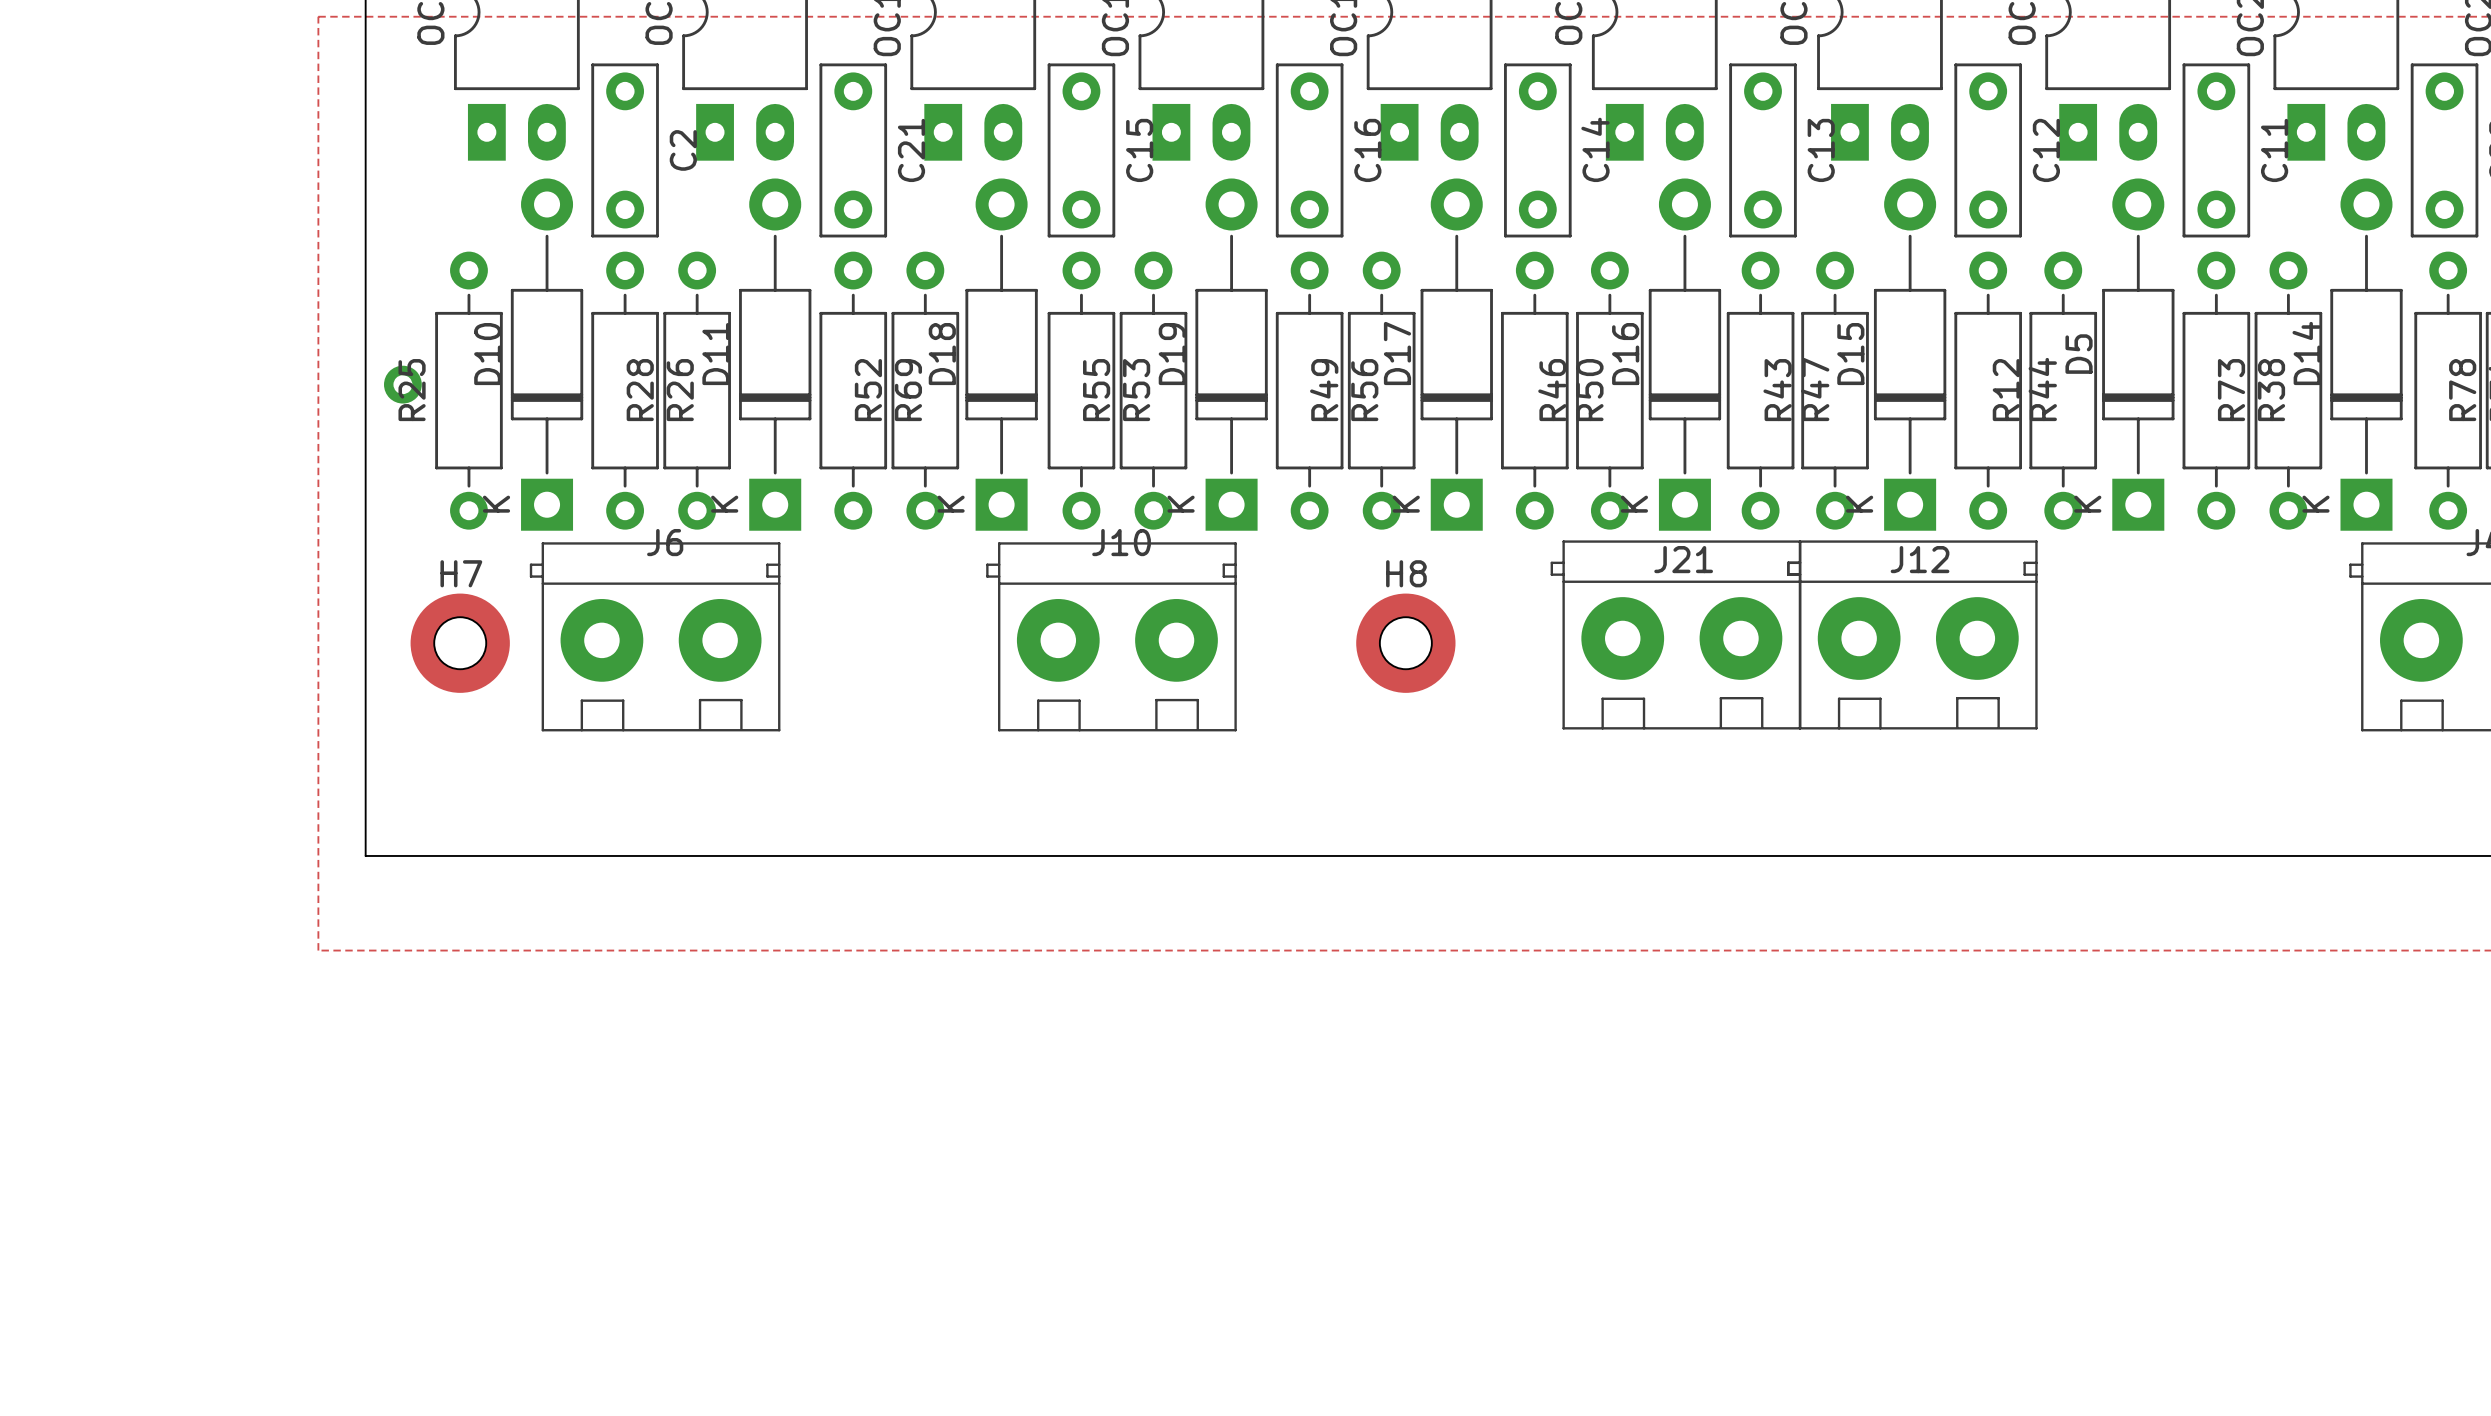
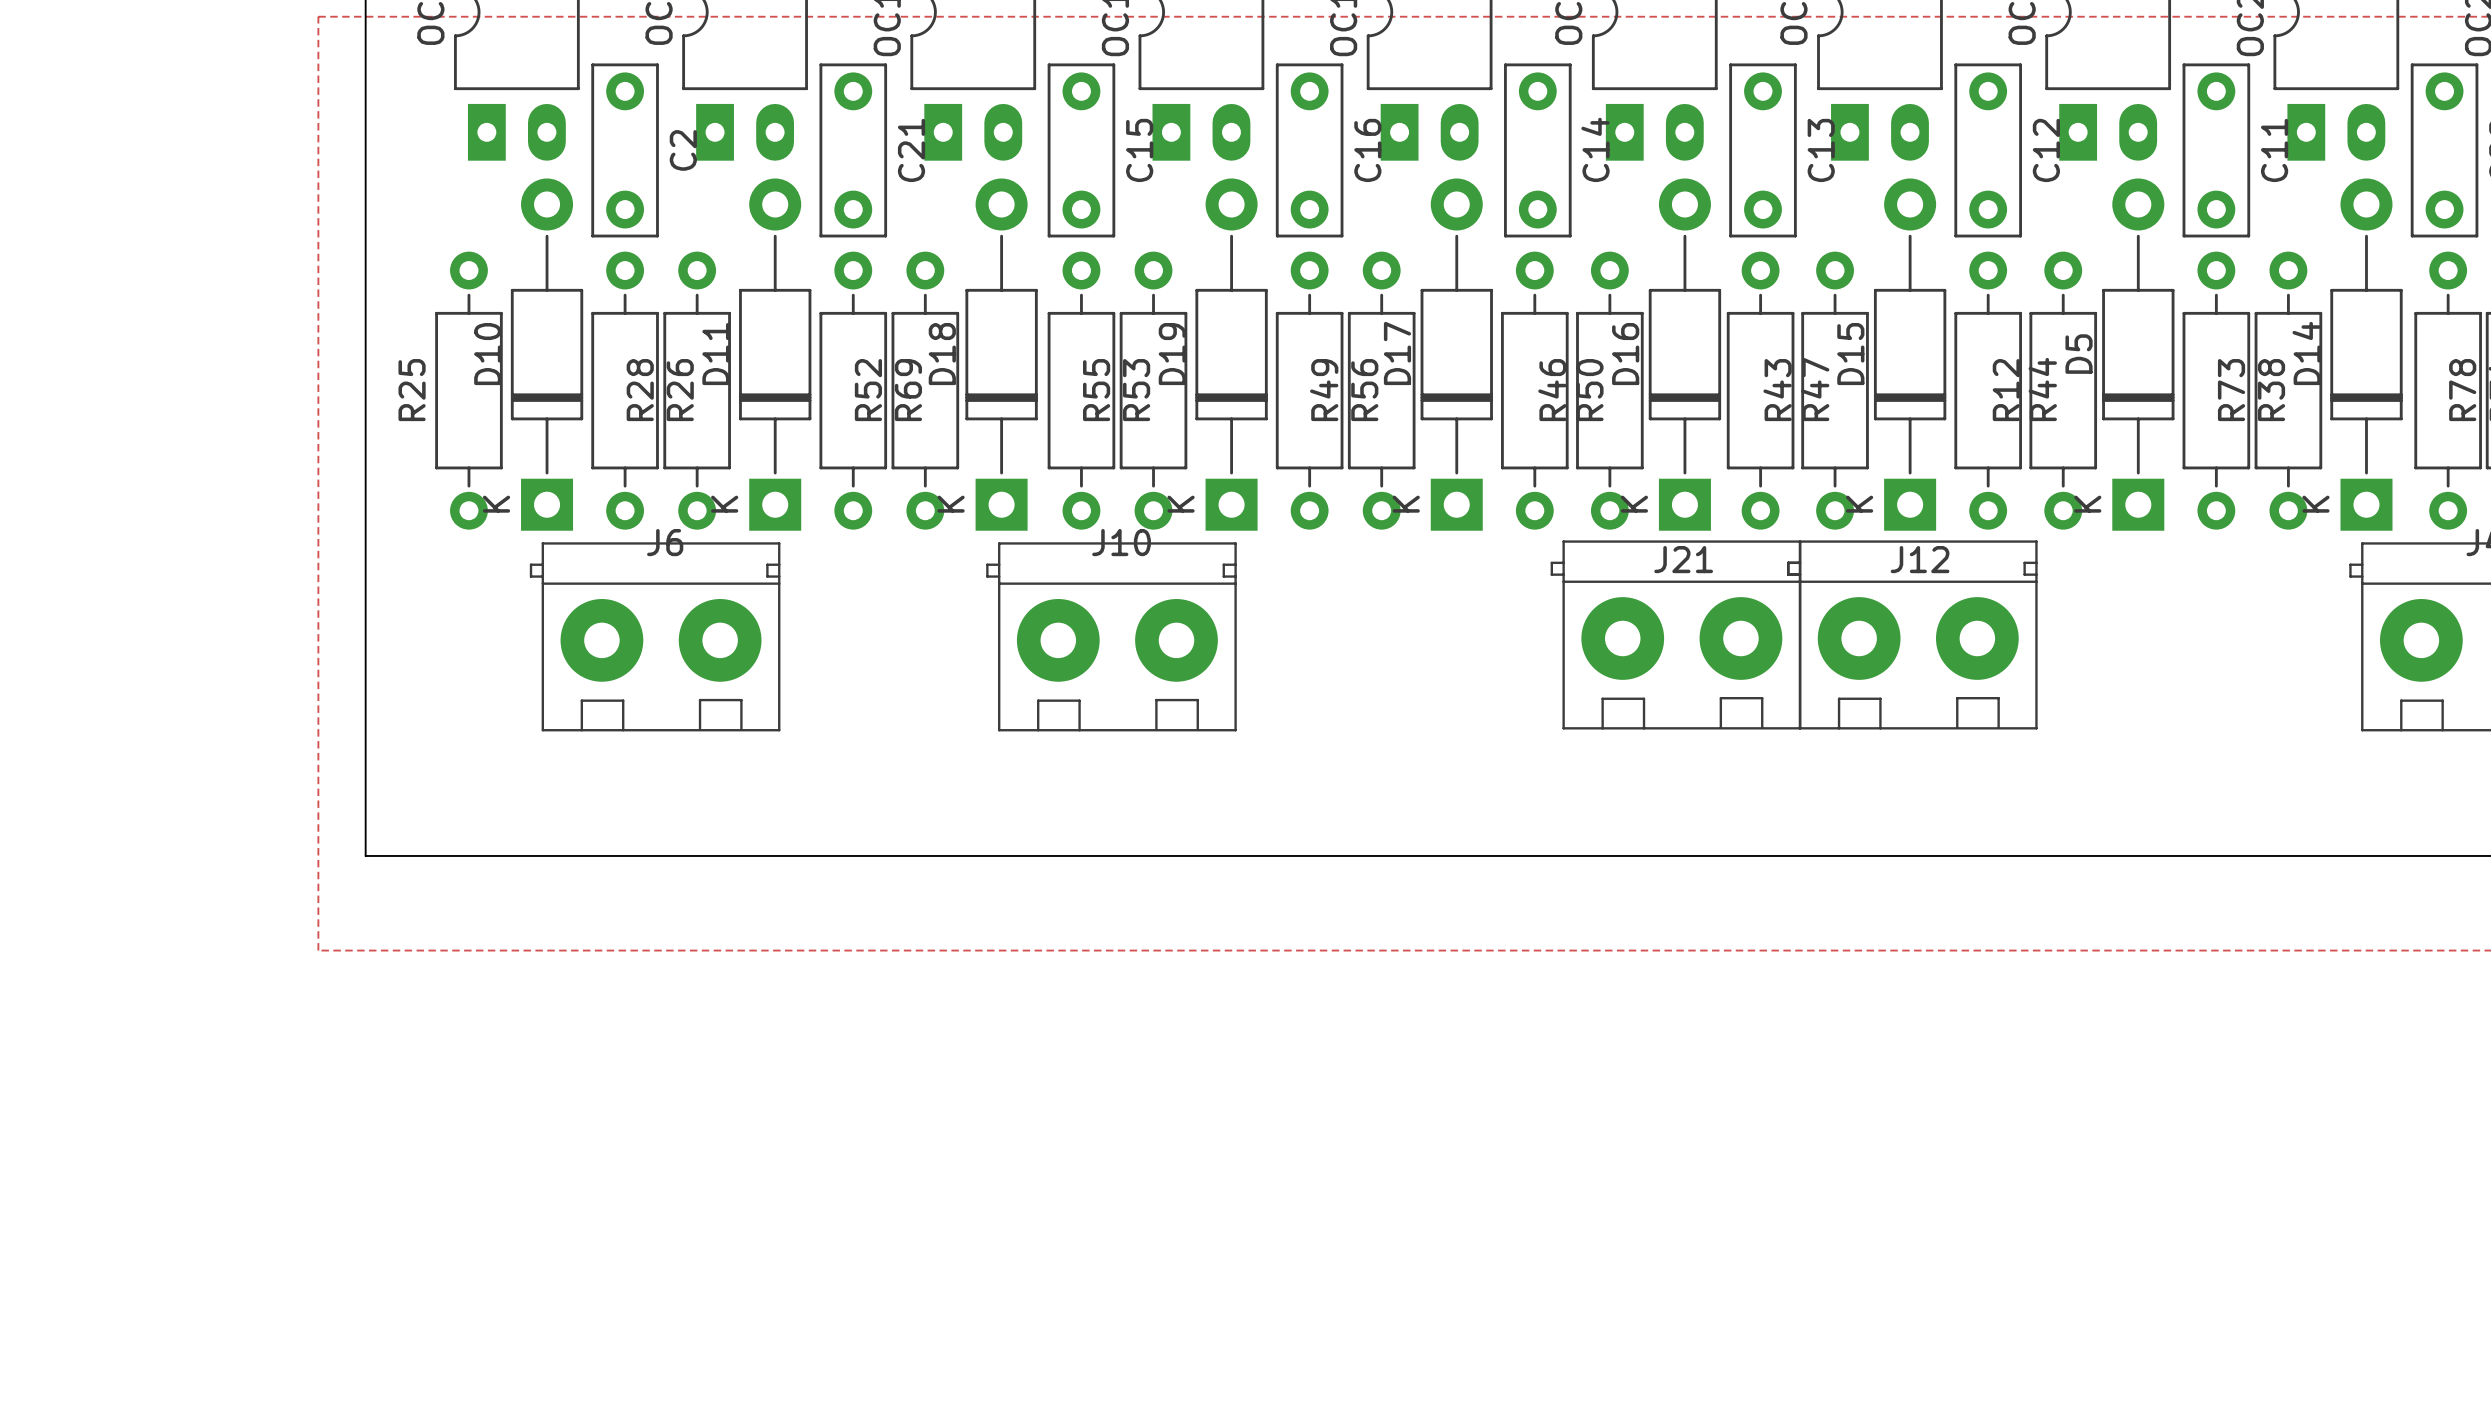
via: (402, 384) -> none
H7: (460, 643) -> none
H8: (1405, 643) -> none

